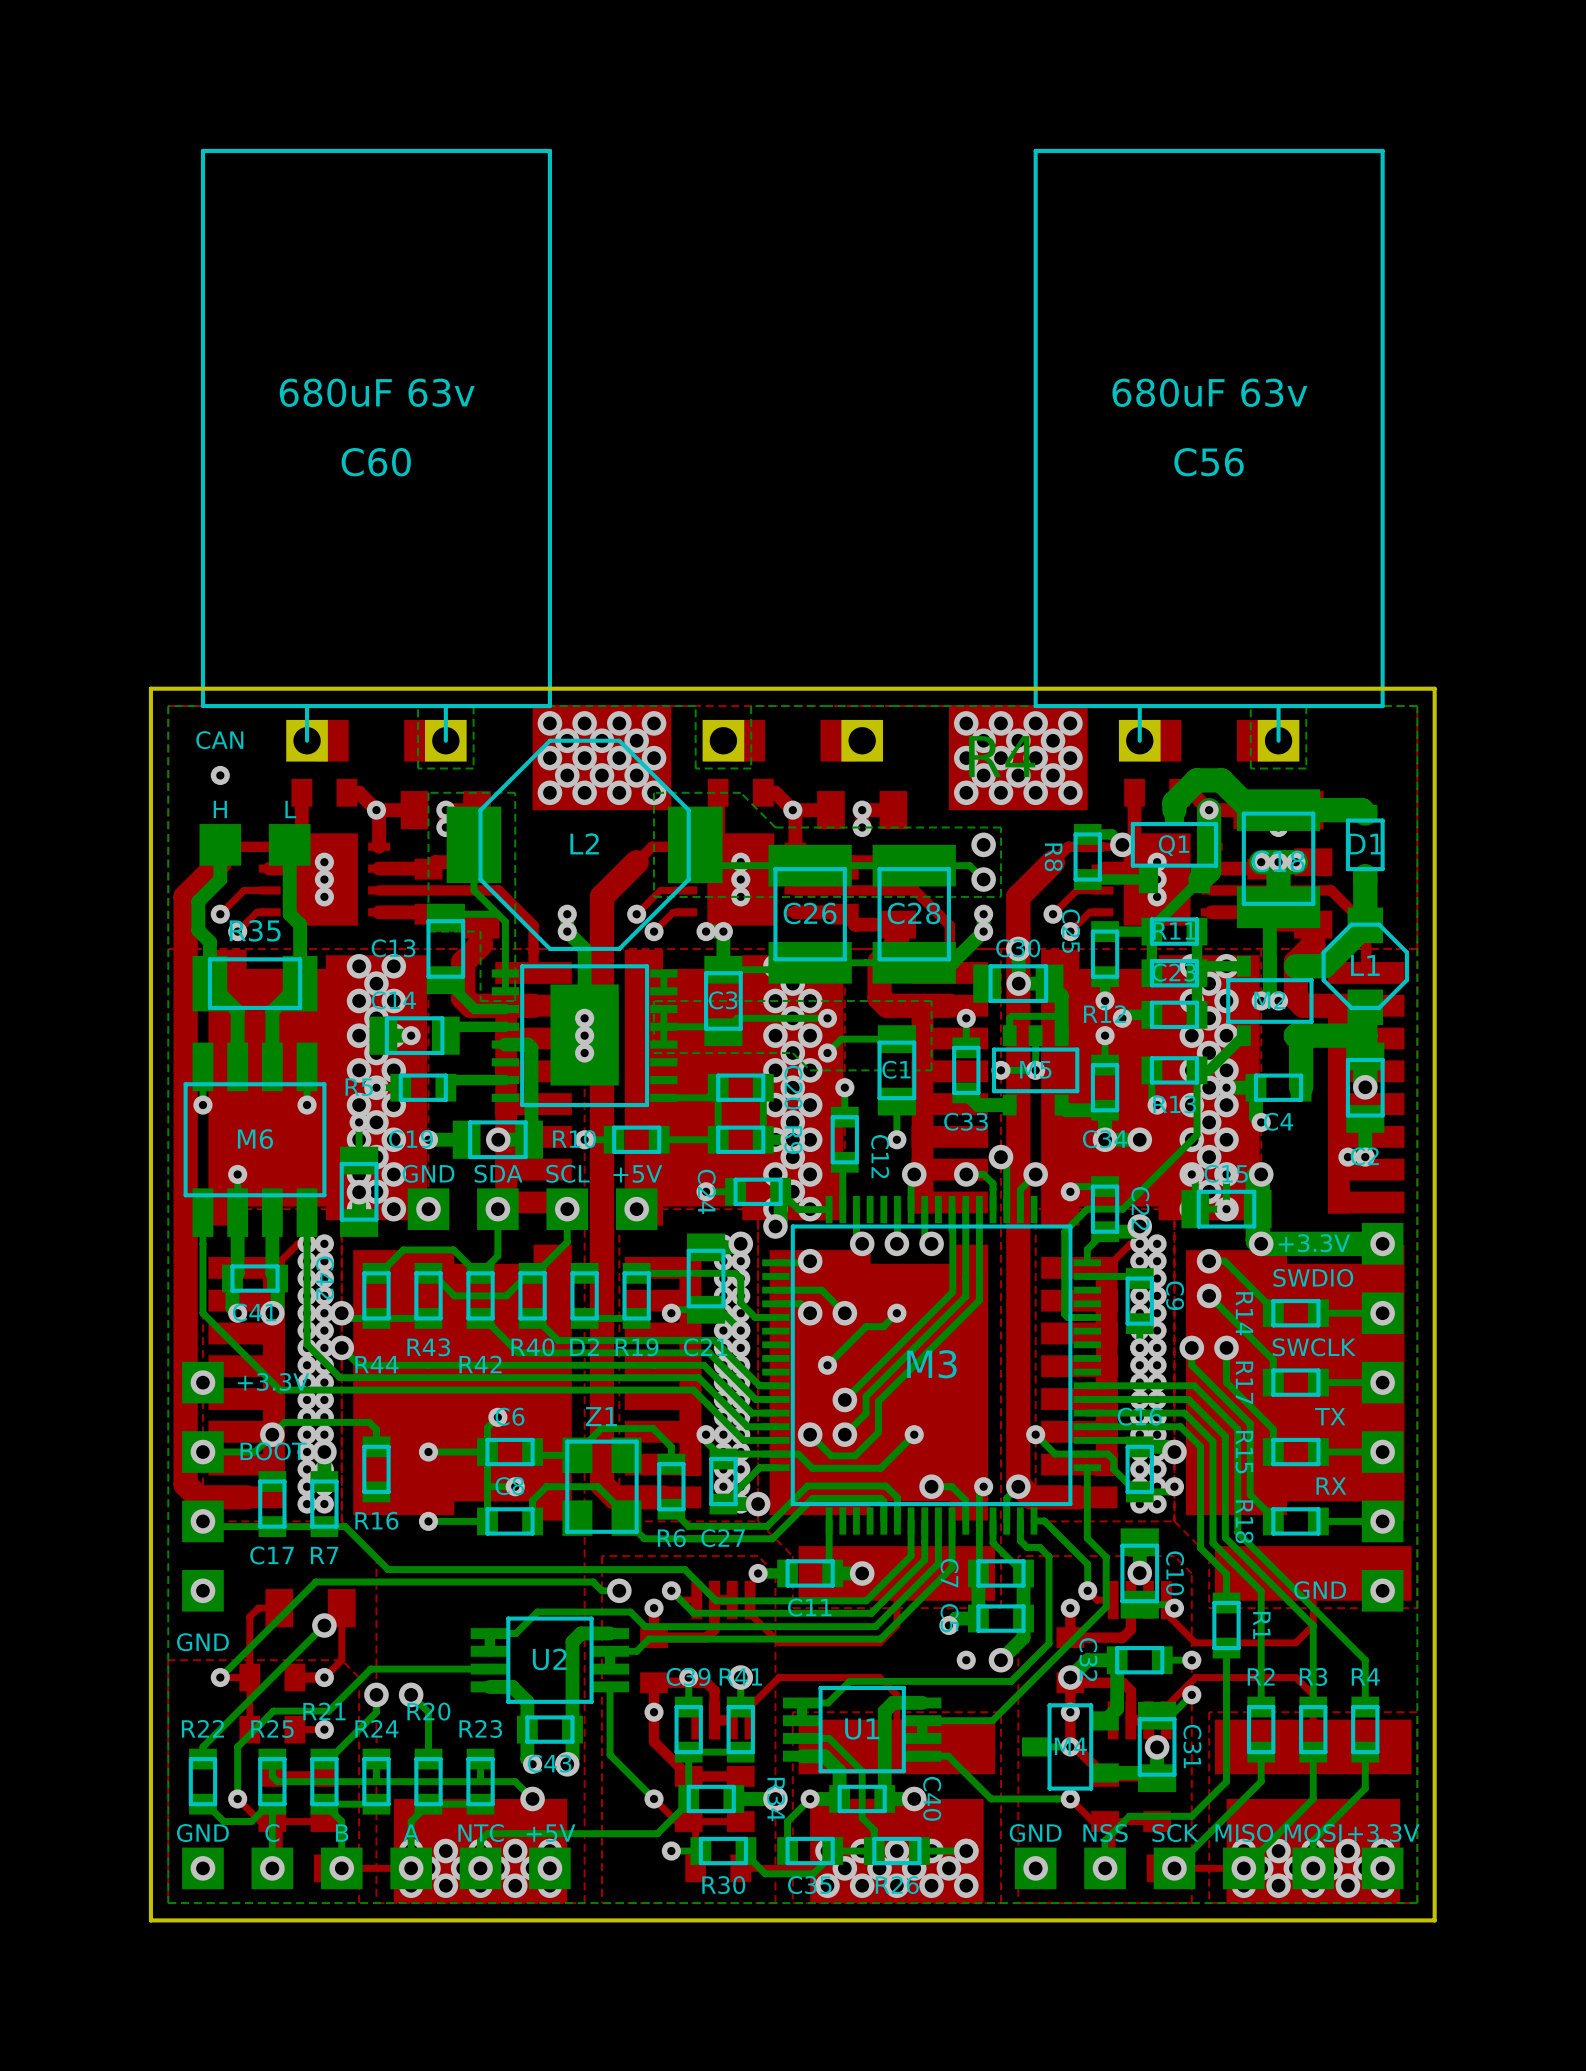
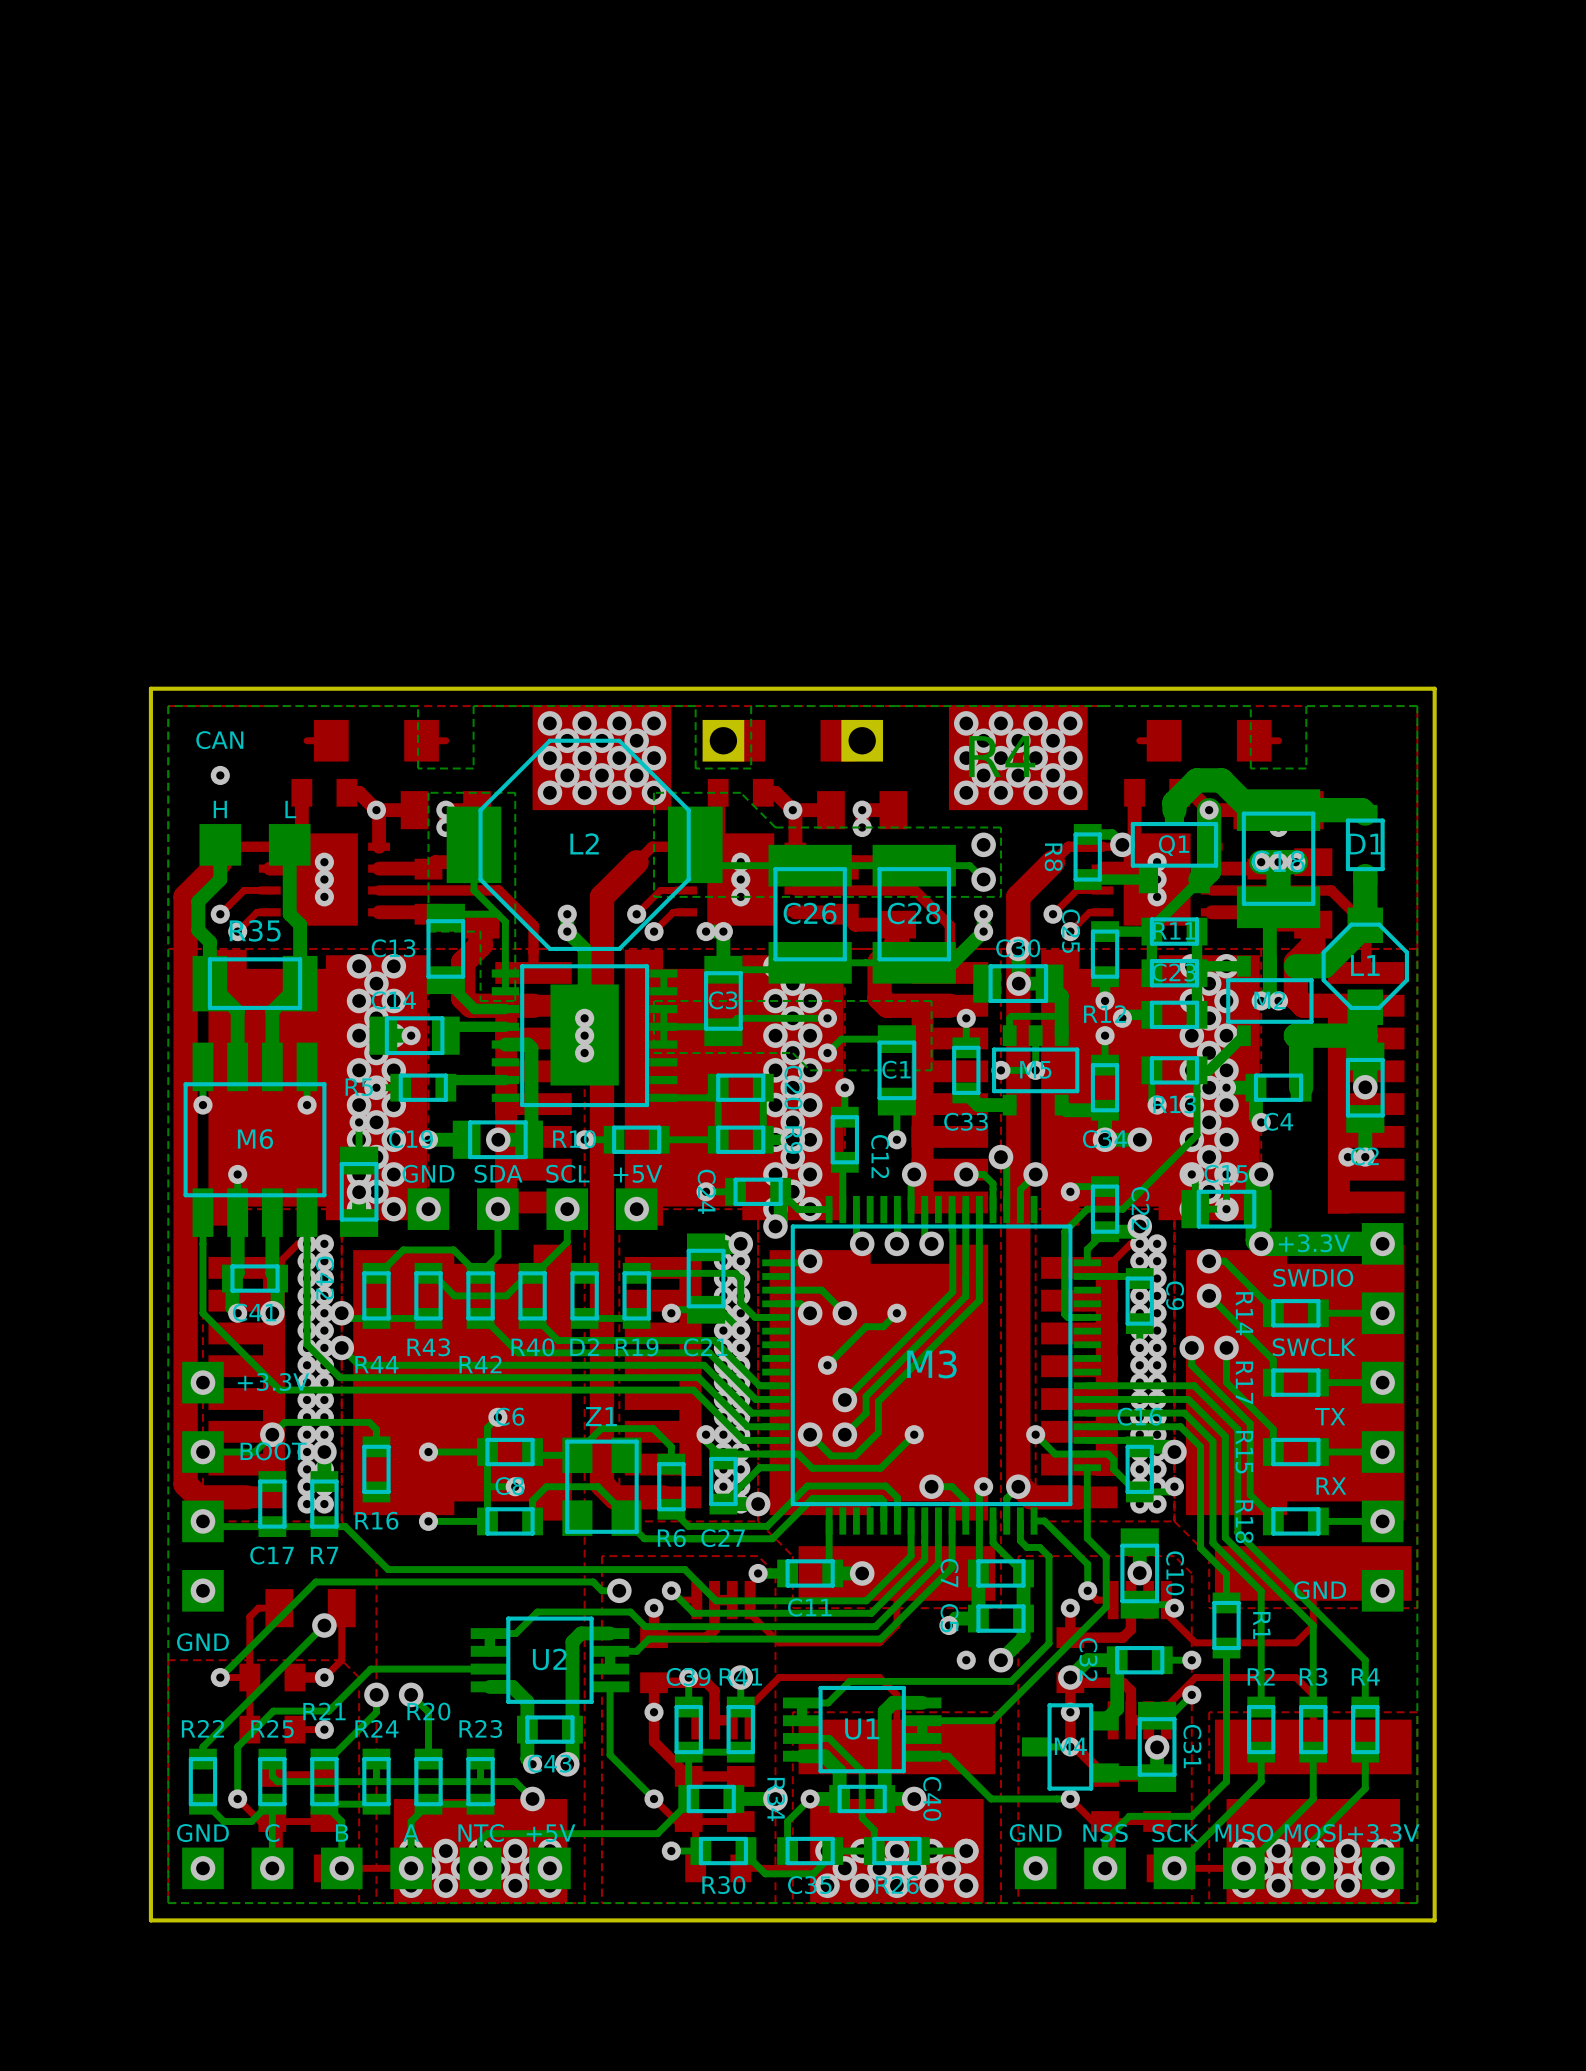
C60: 680uF 63v (376, 455) -> none
C56: 680uF 63v (1209, 455) -> none

